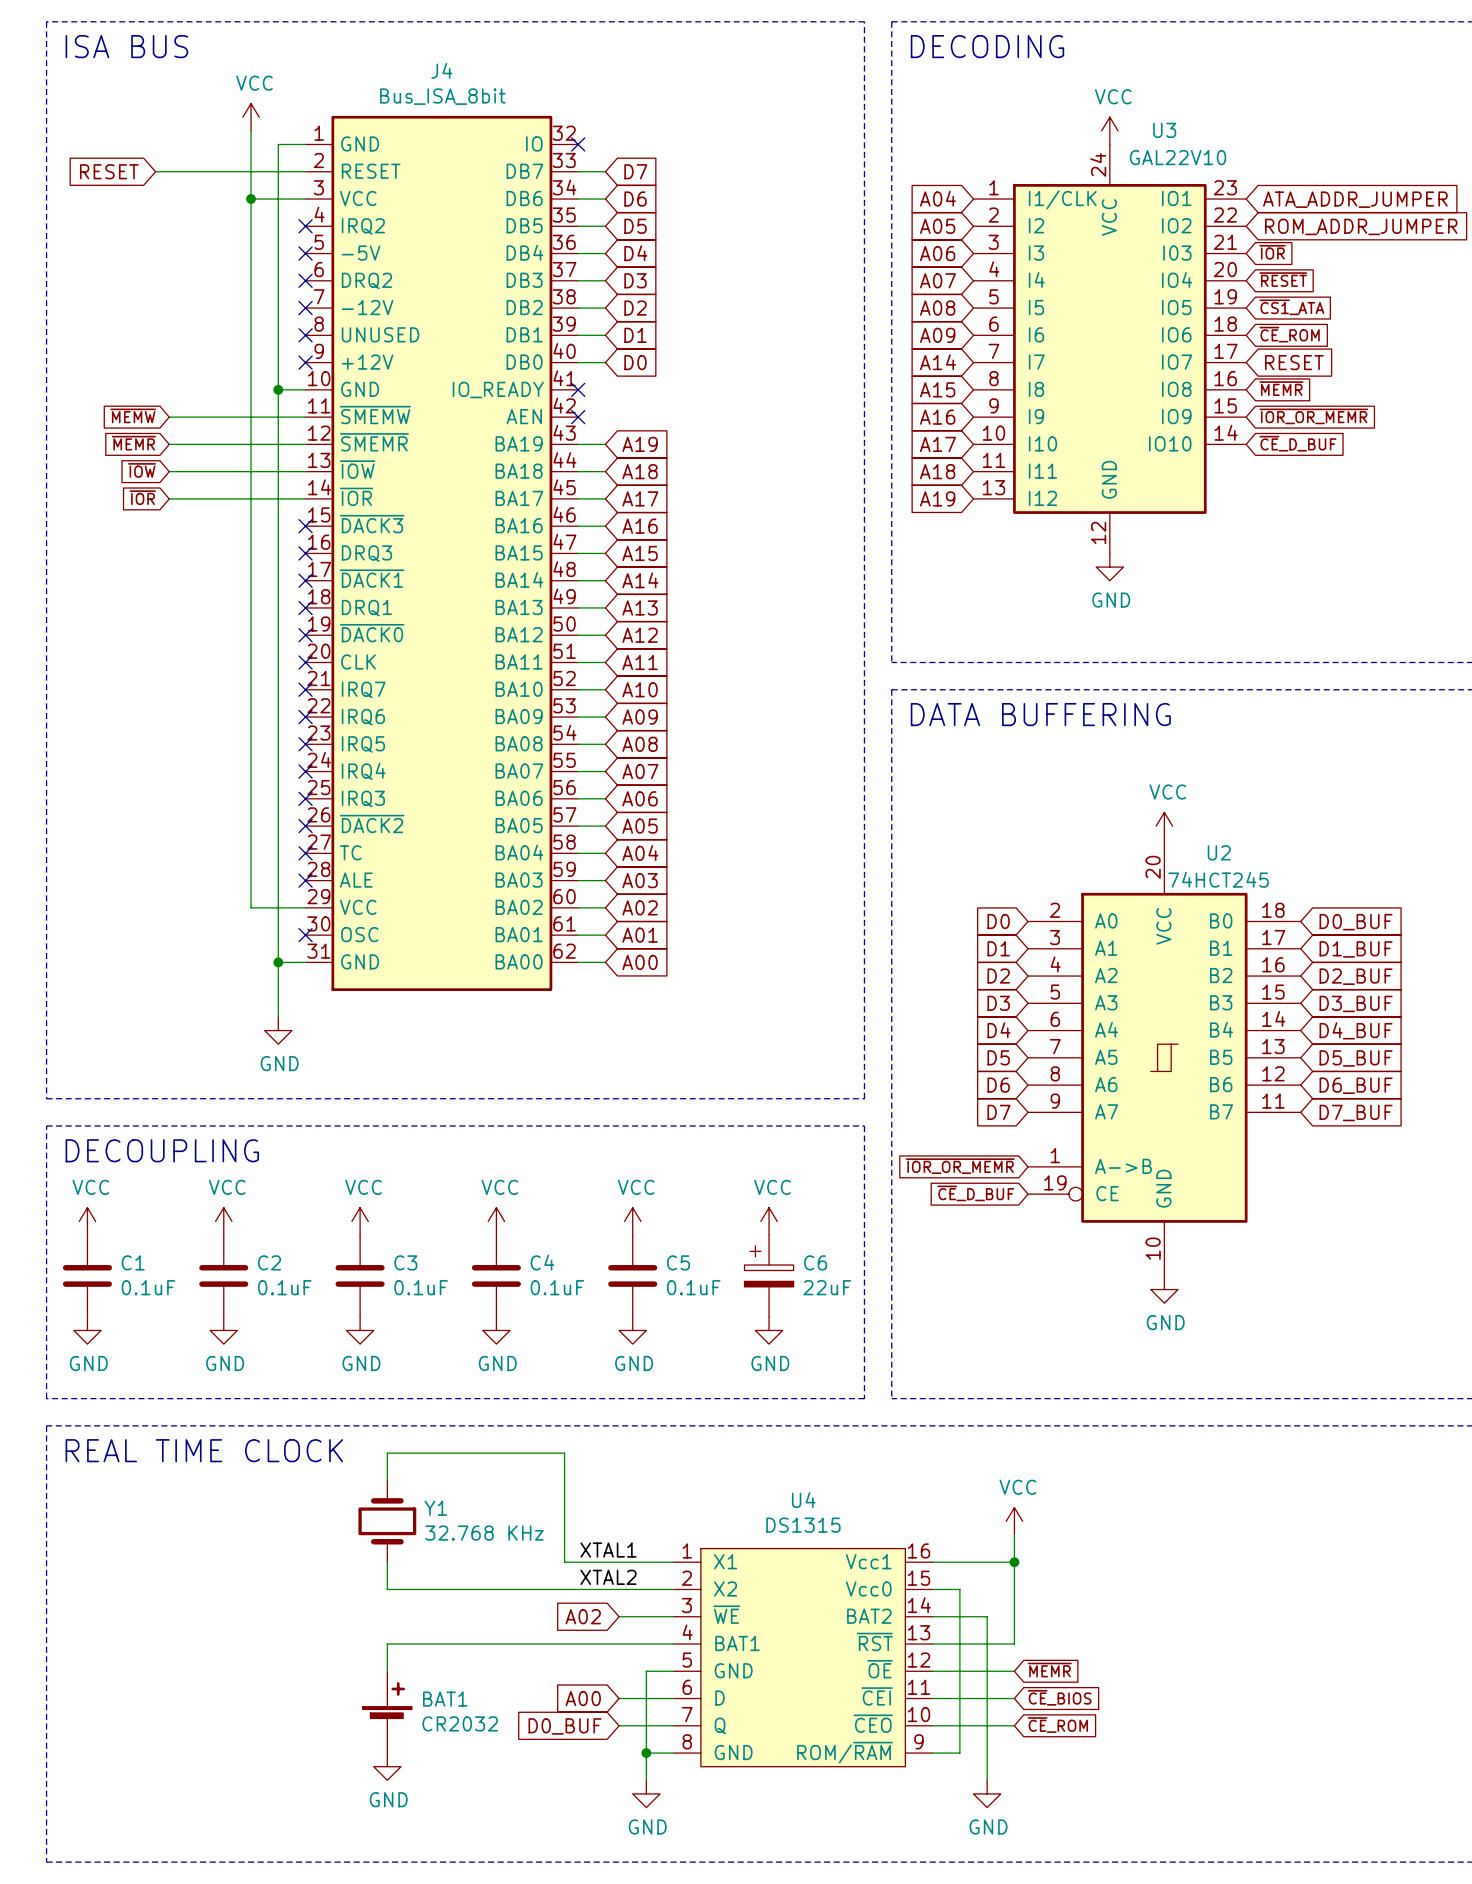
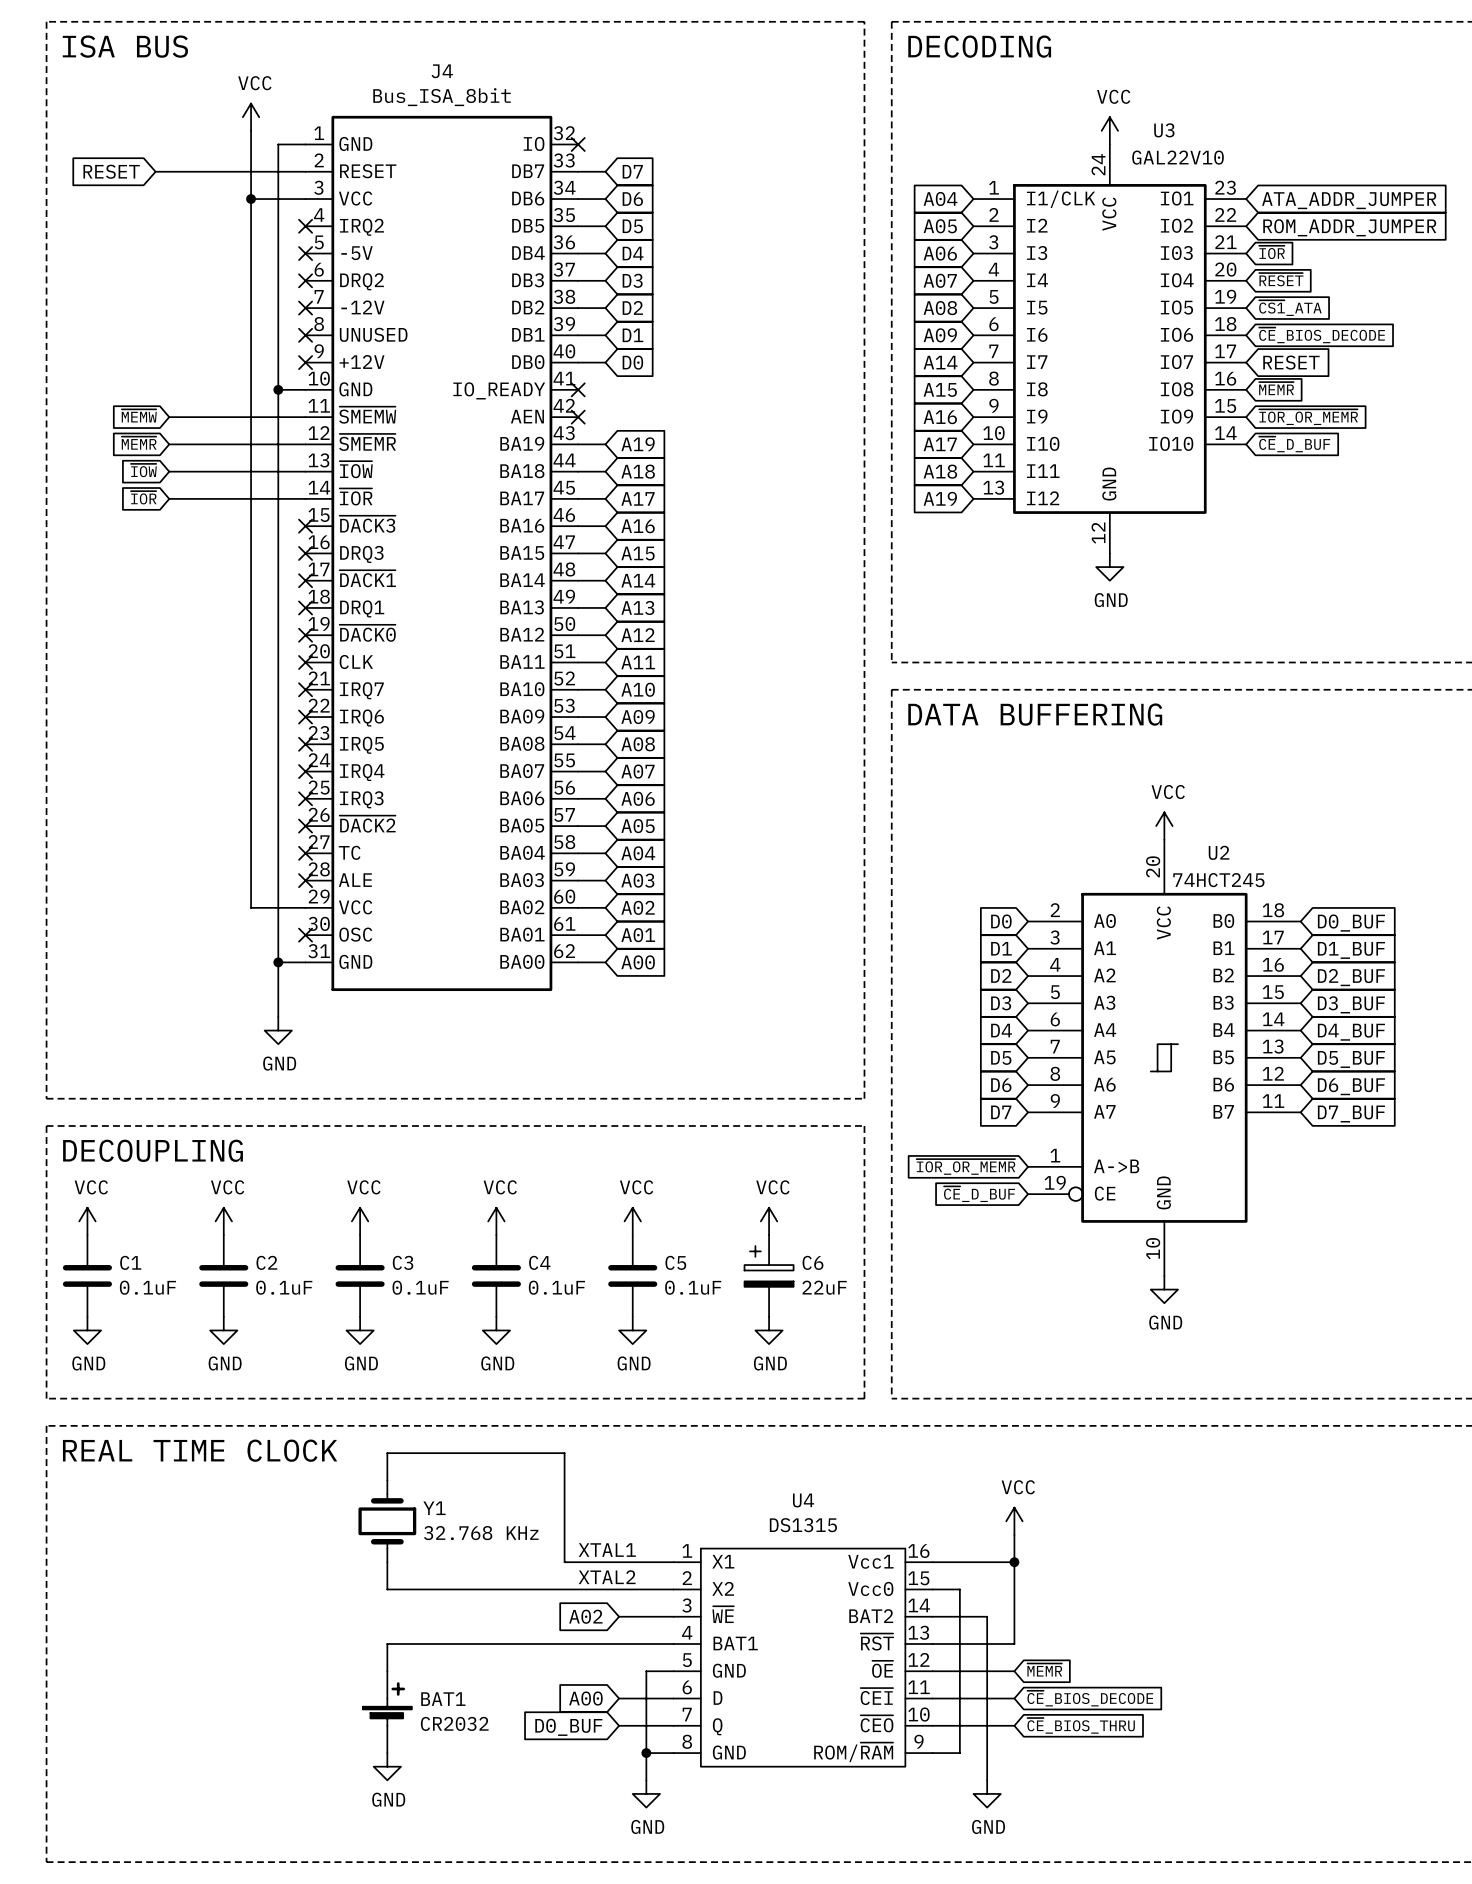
global label: ~{CE}_ROM (1289, 334) -> ~{CE}_BIOS_DECODE (1322, 335)
global label: ~{CE}_BIOS (1059, 1697) -> ~{CE}_BIOS_DECODE (1090, 1698)
global label: ~{CE}_ROM (1057, 1725) -> ~{CE}_BIOS_THRU (1081, 1725)

